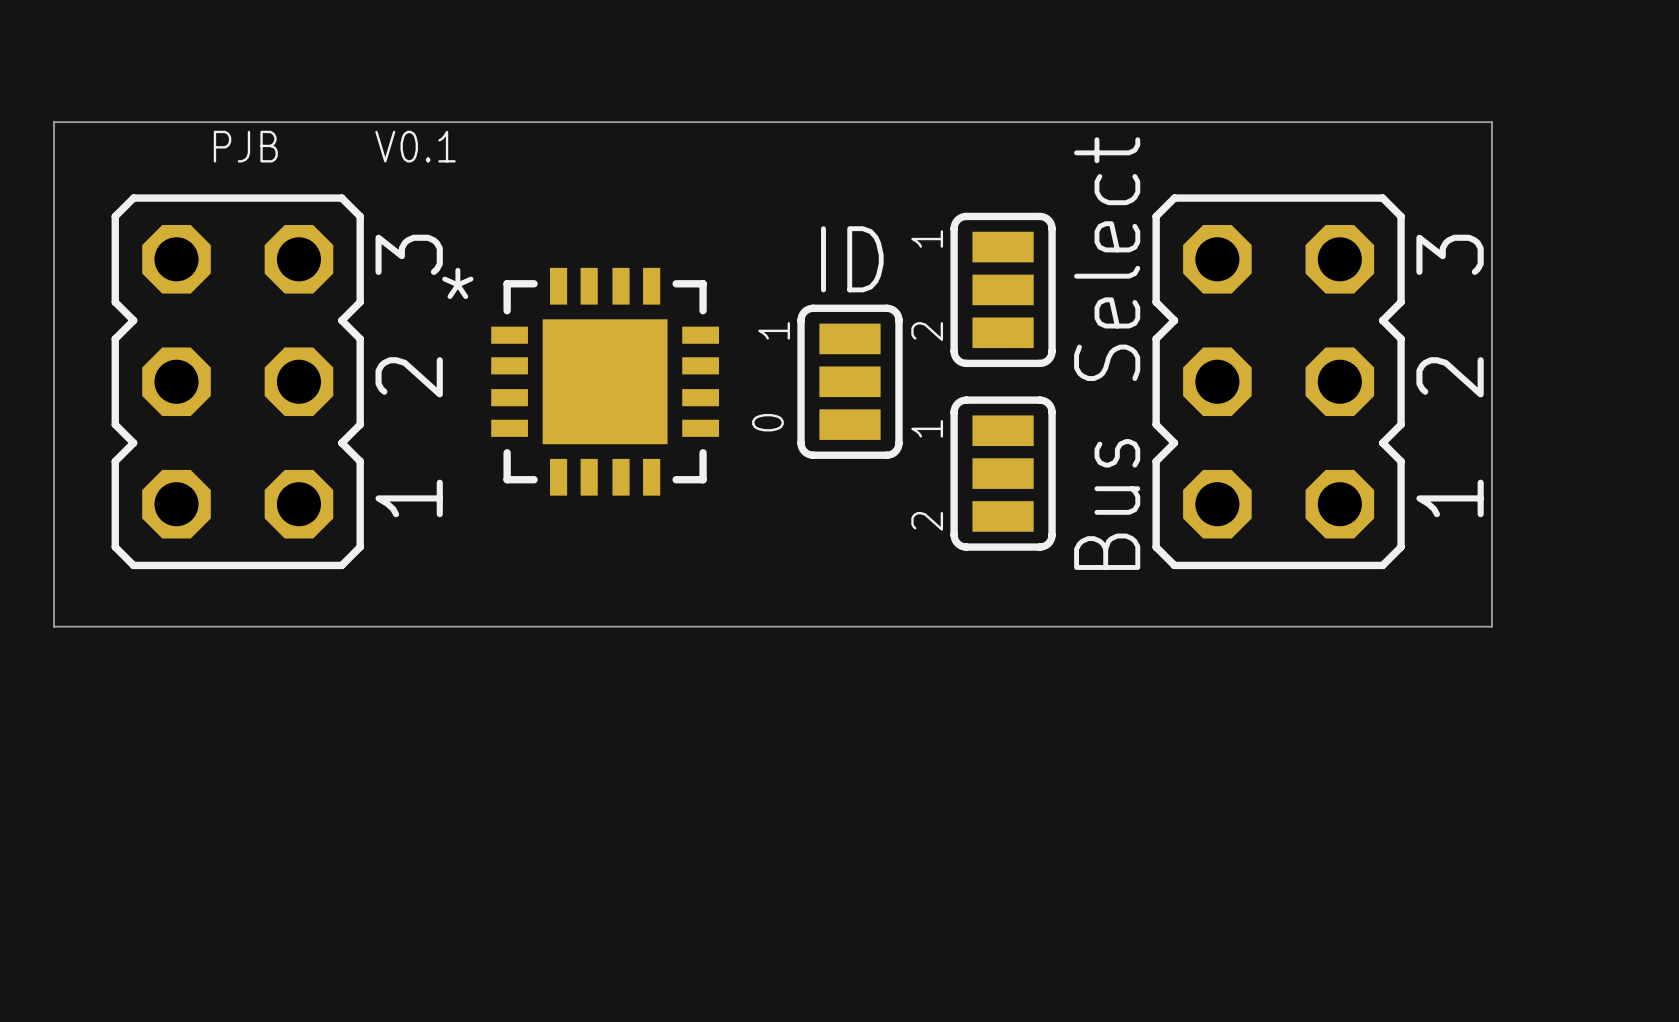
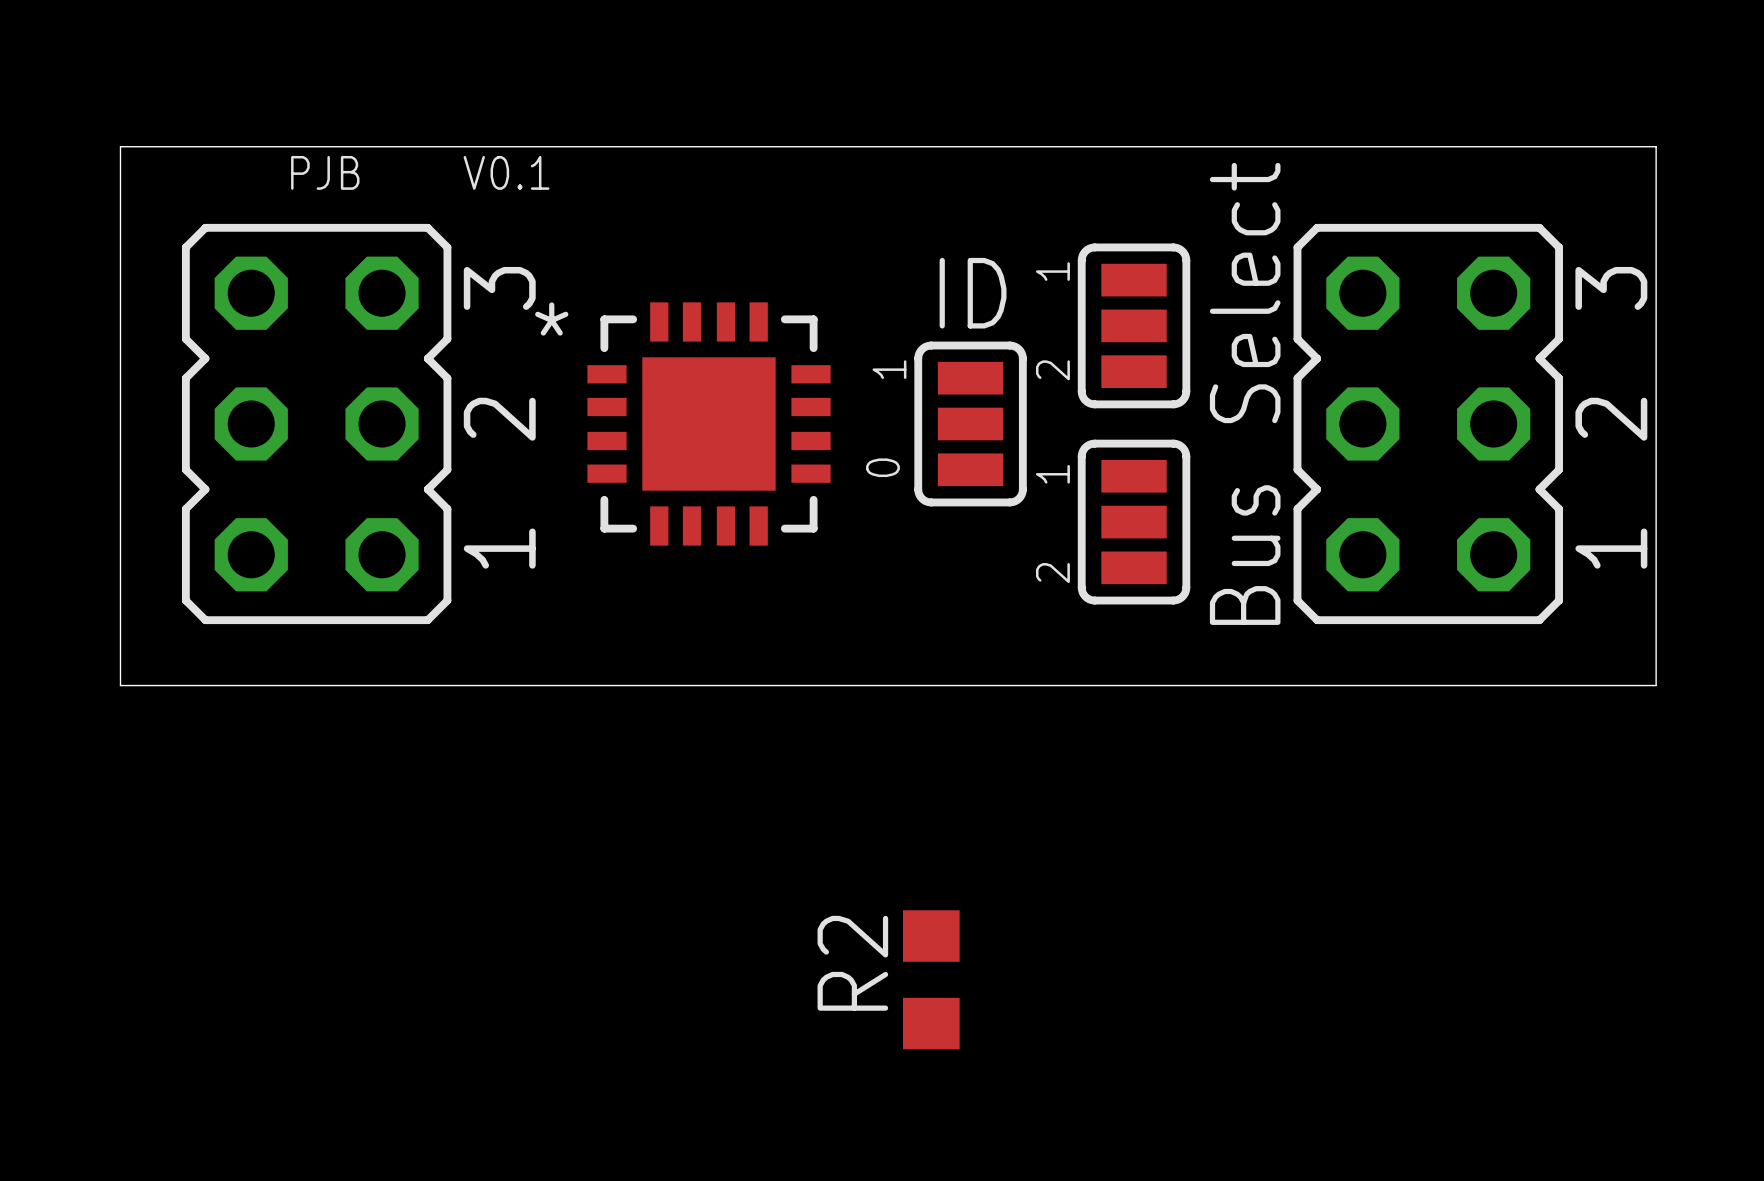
R2: none -> (931, 979)

